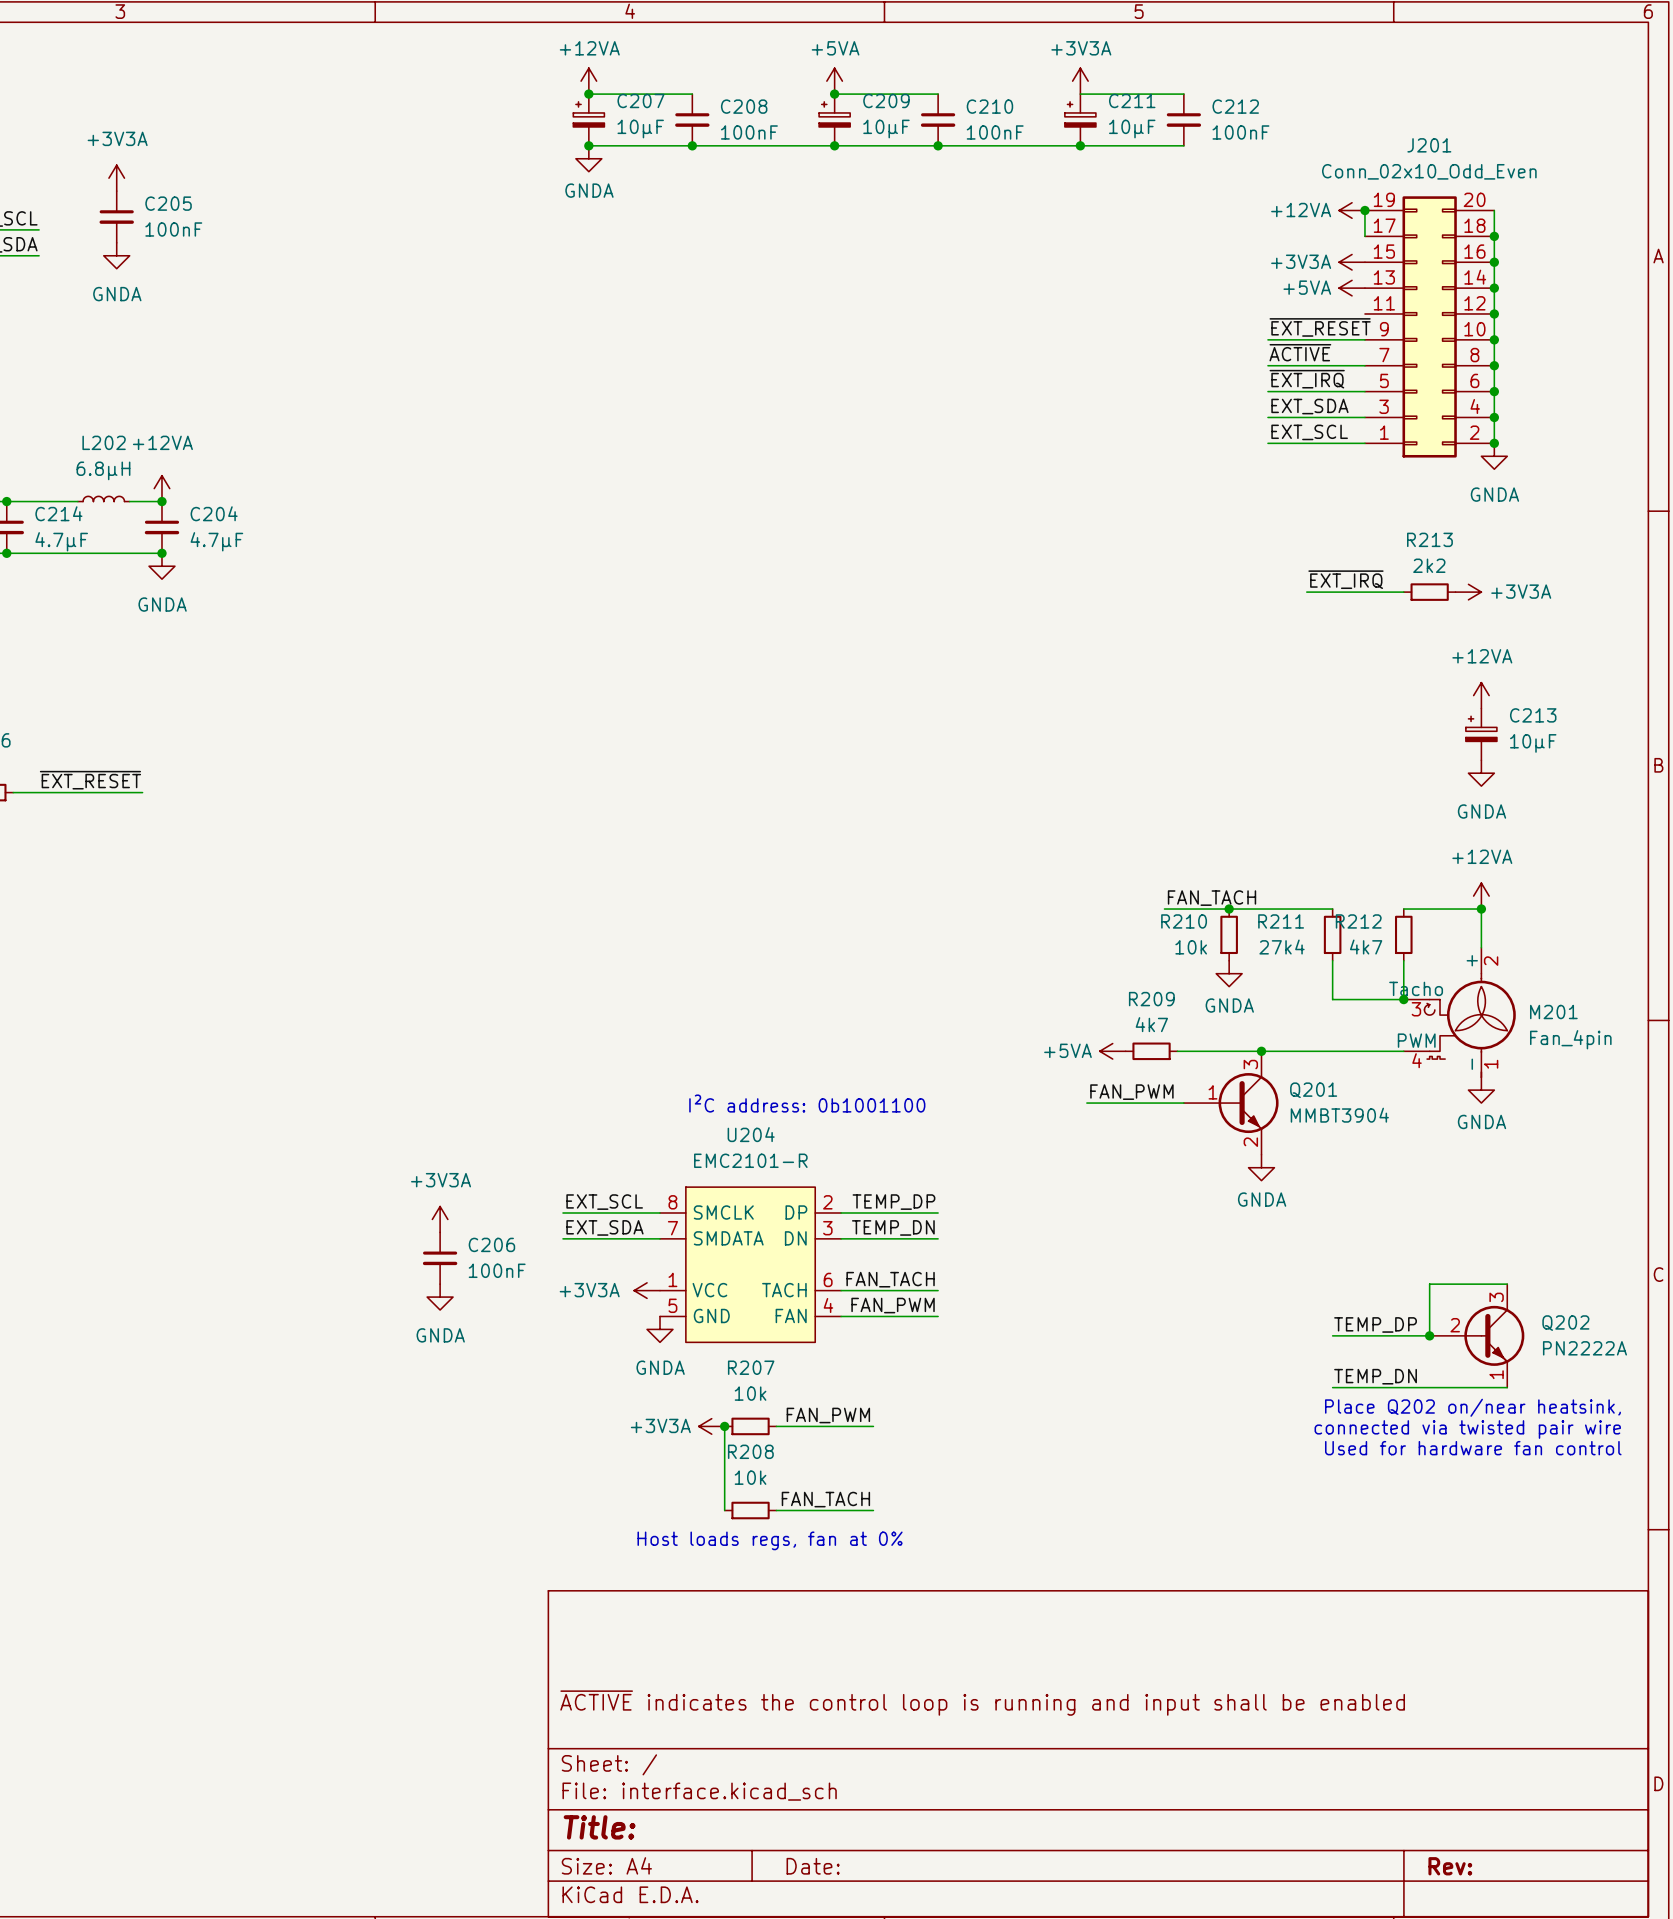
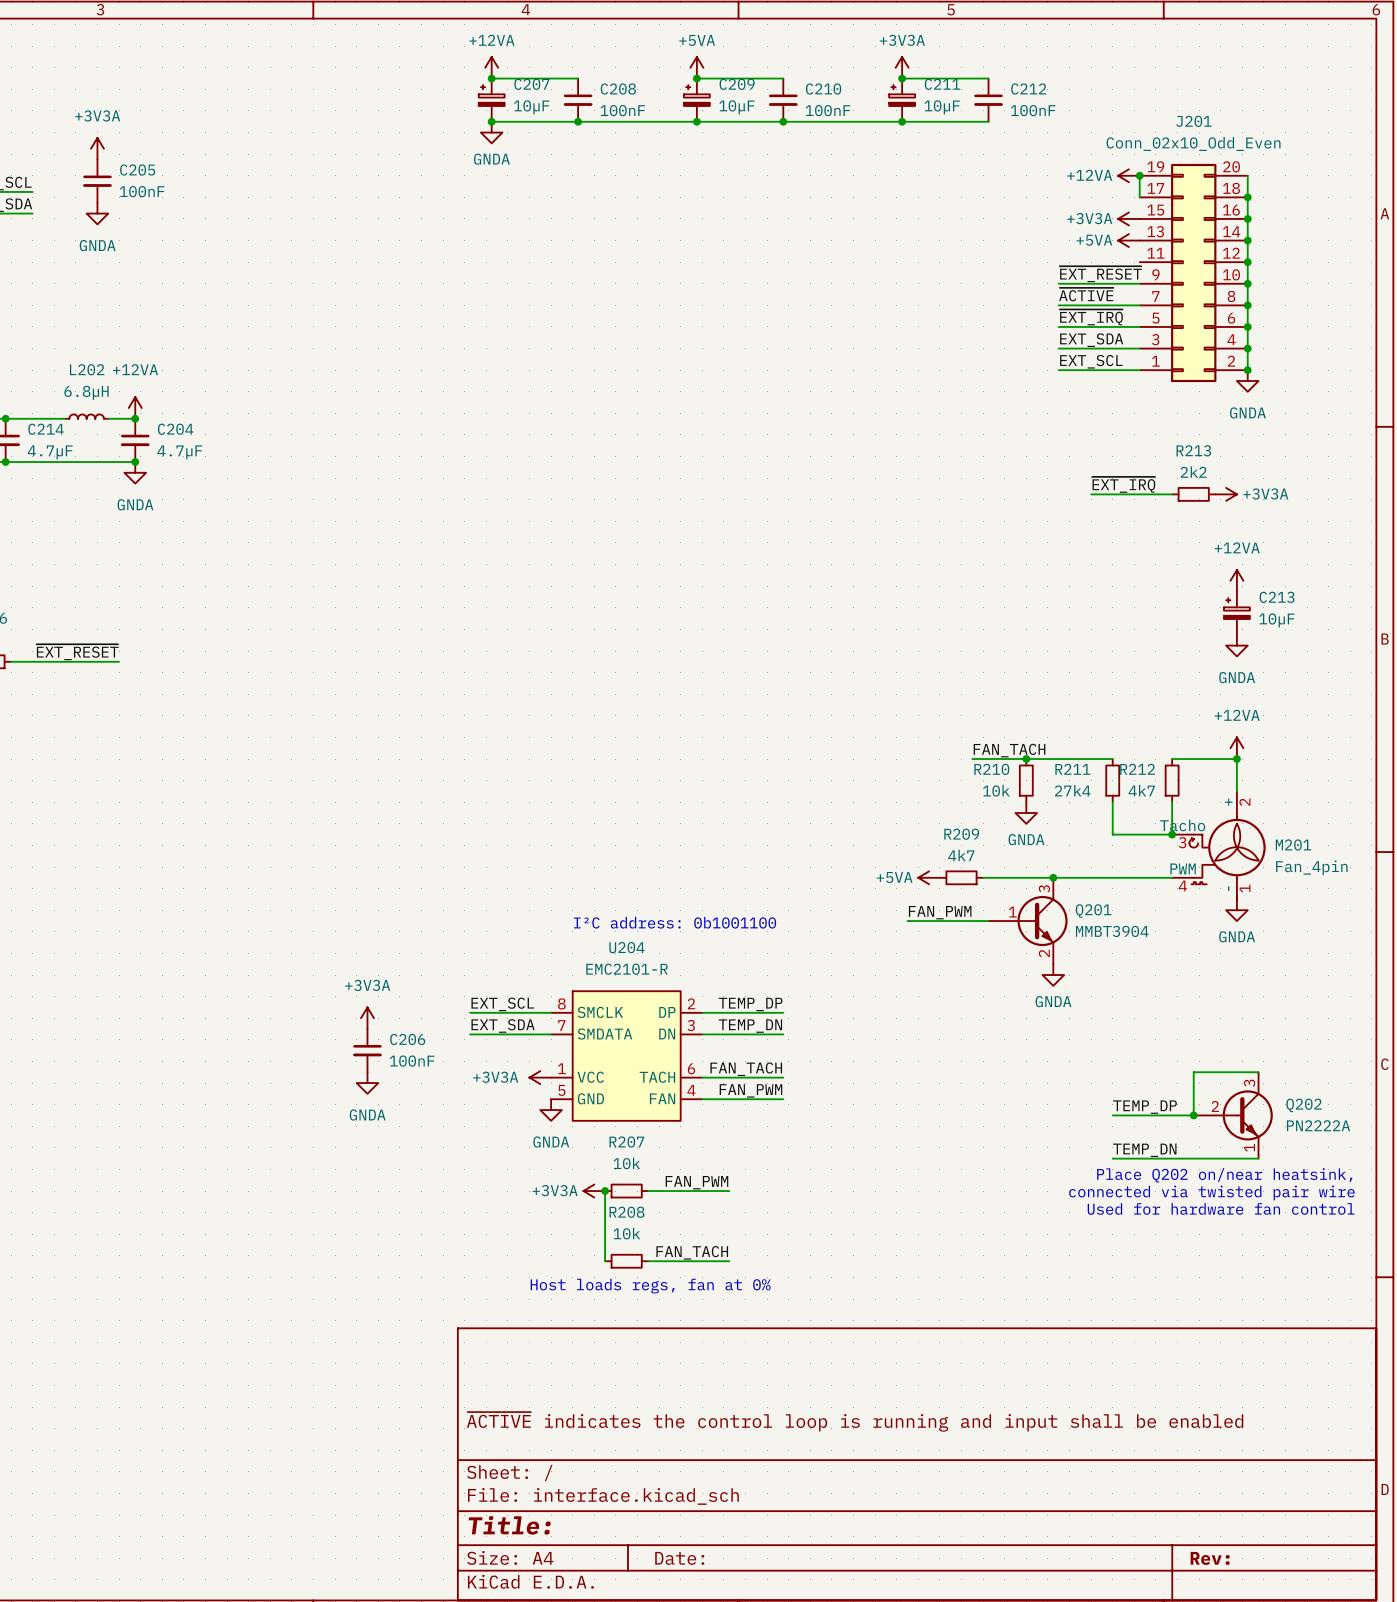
junction: none -> (902, 78)

